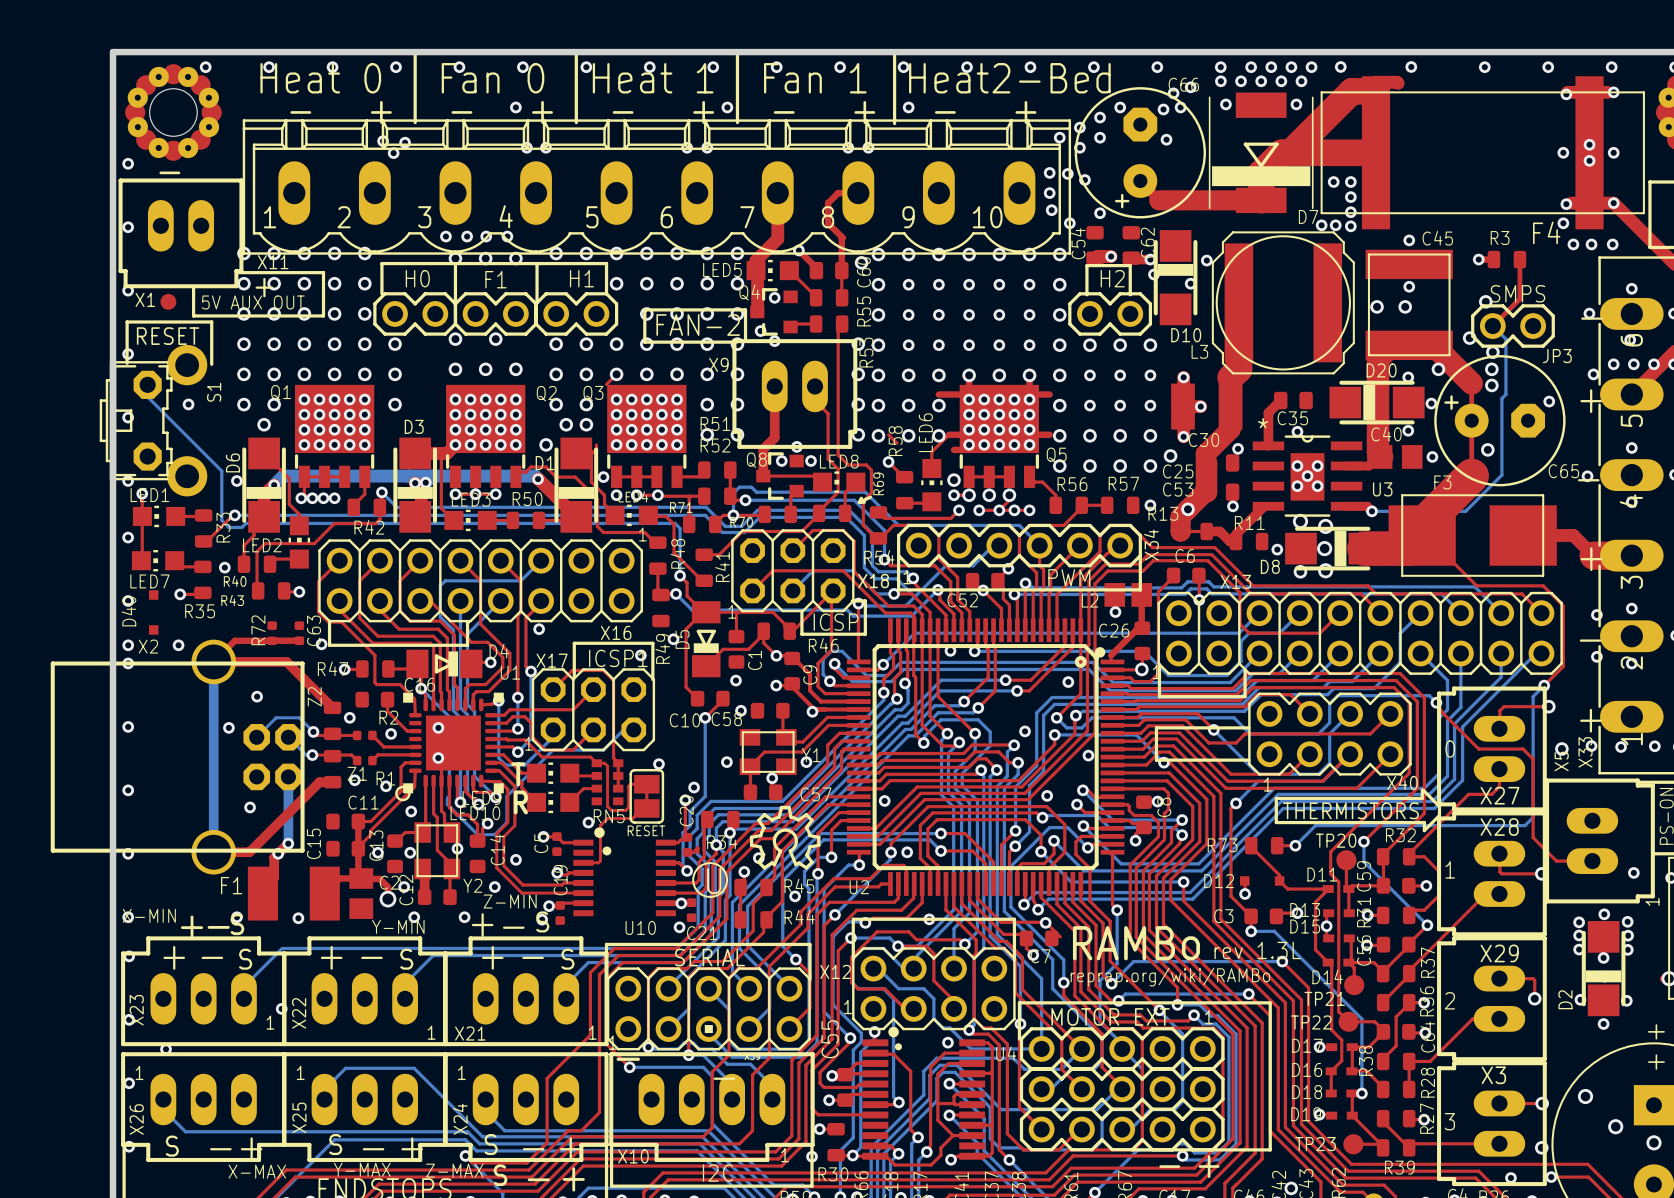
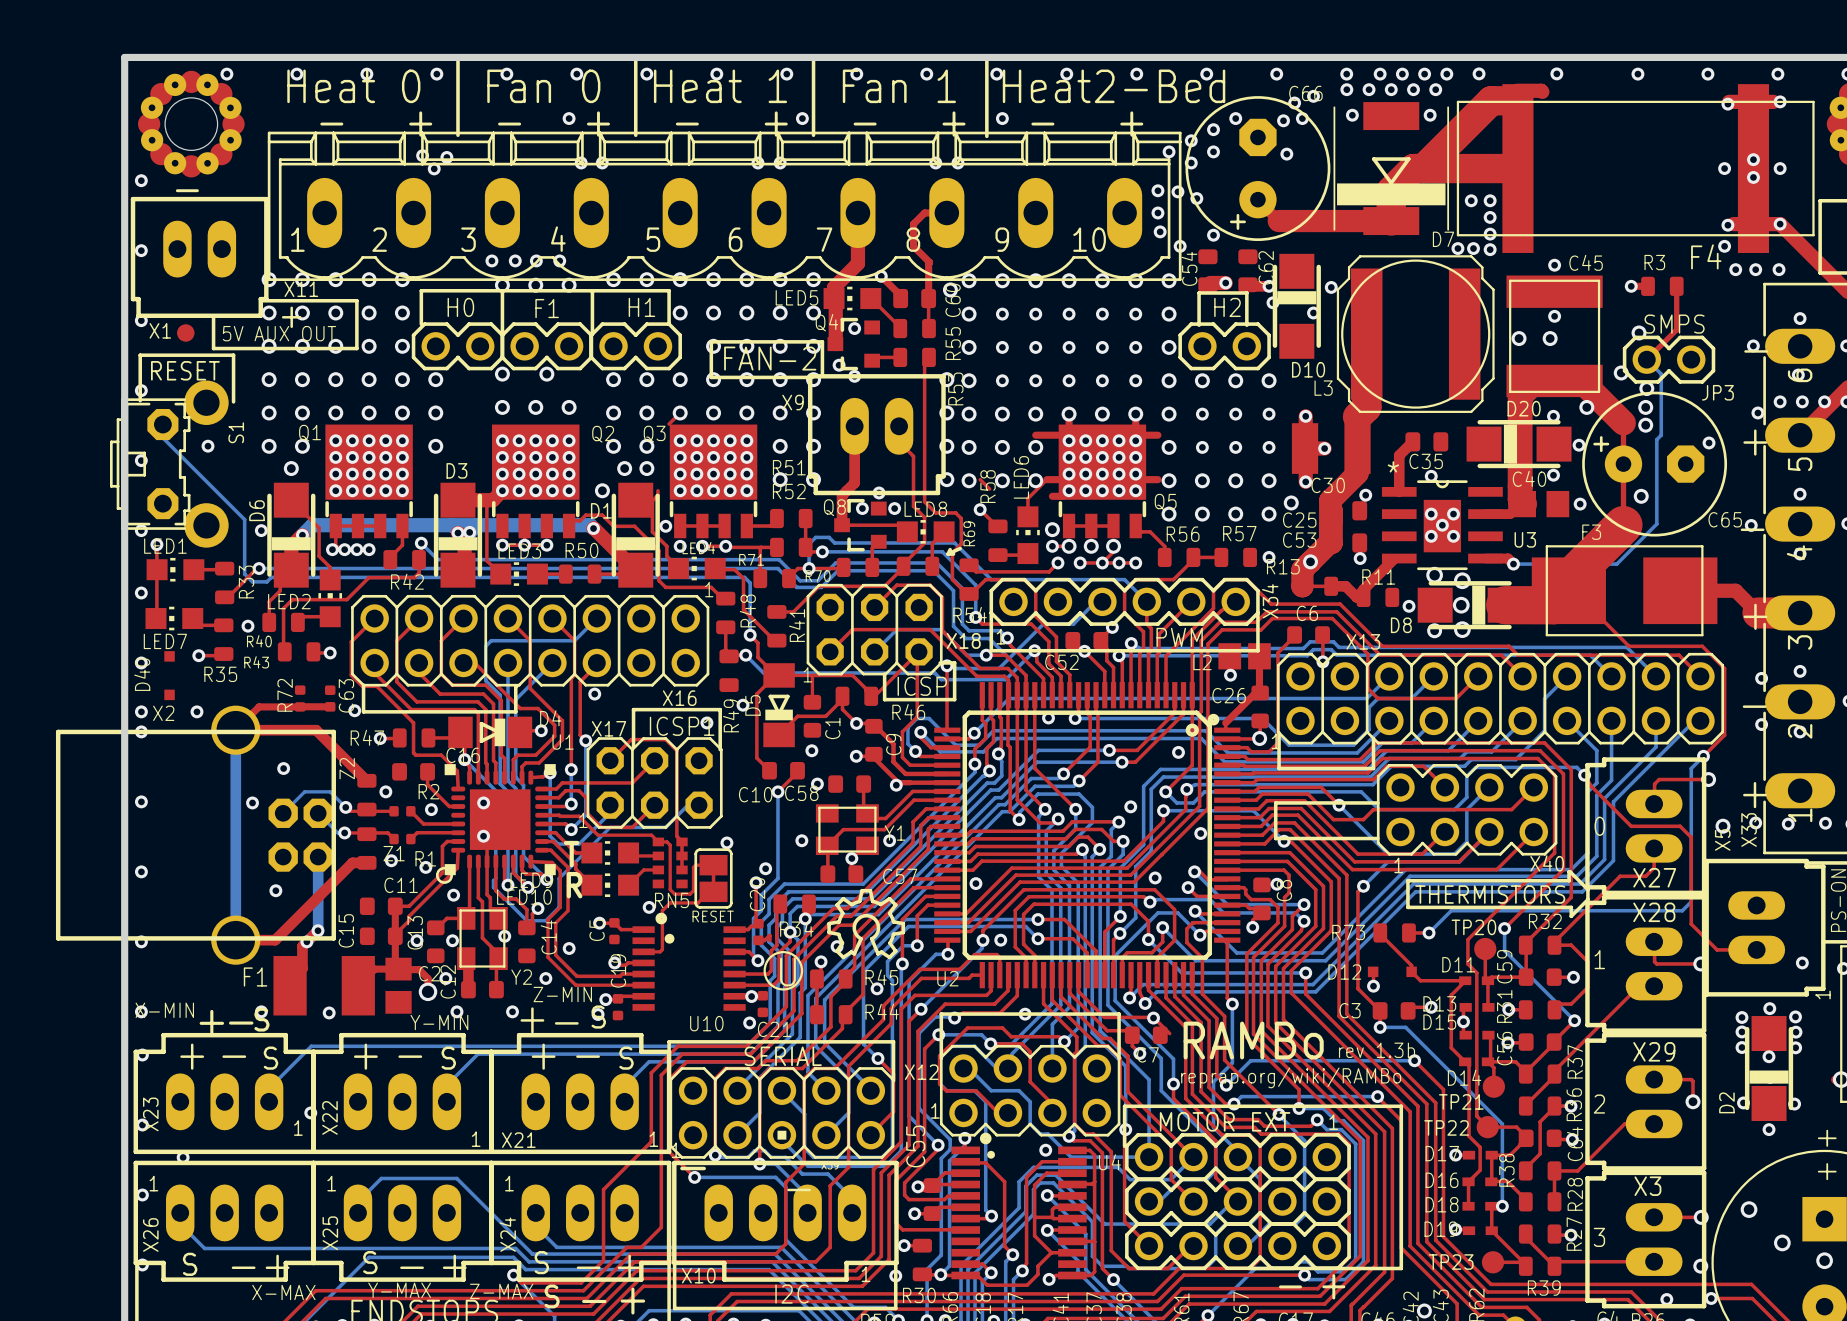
text: rev 1.3L (1257, 950) -> rev 1.3b (1377, 1050)

